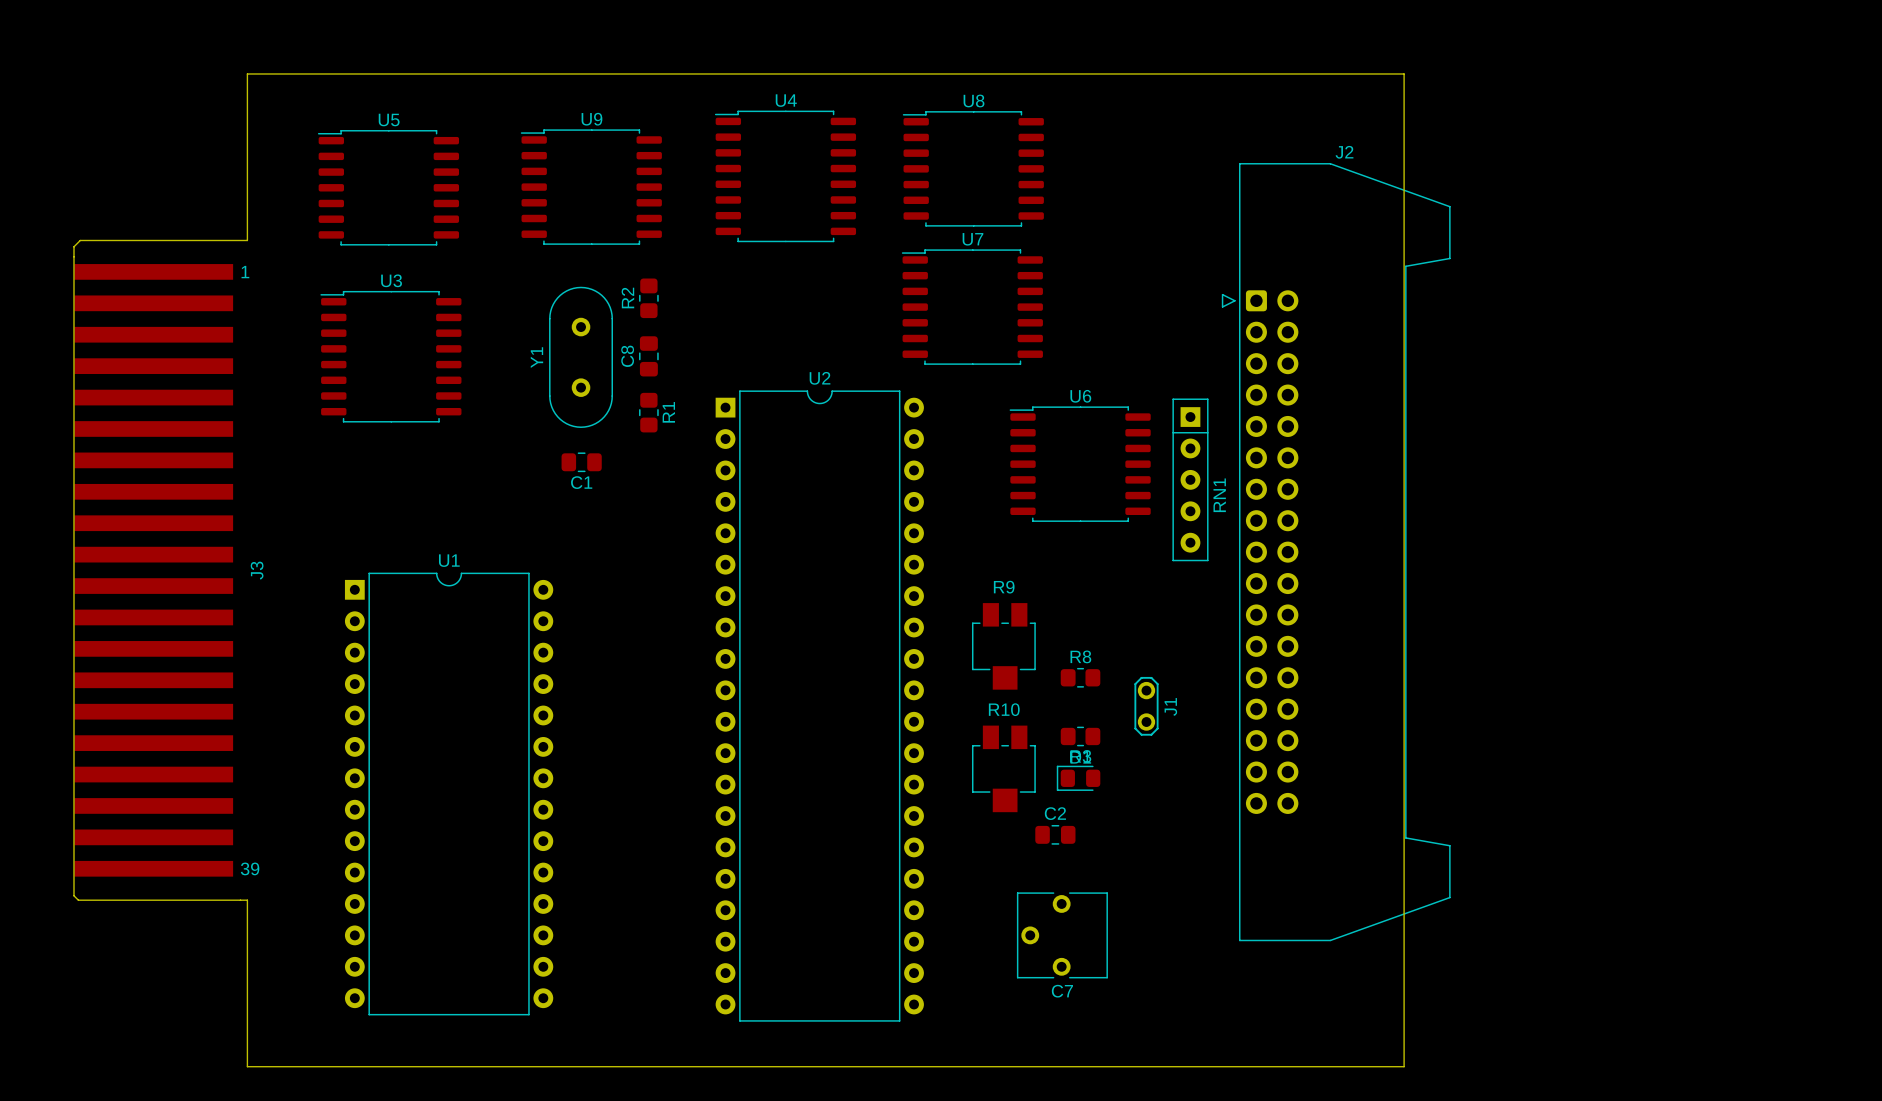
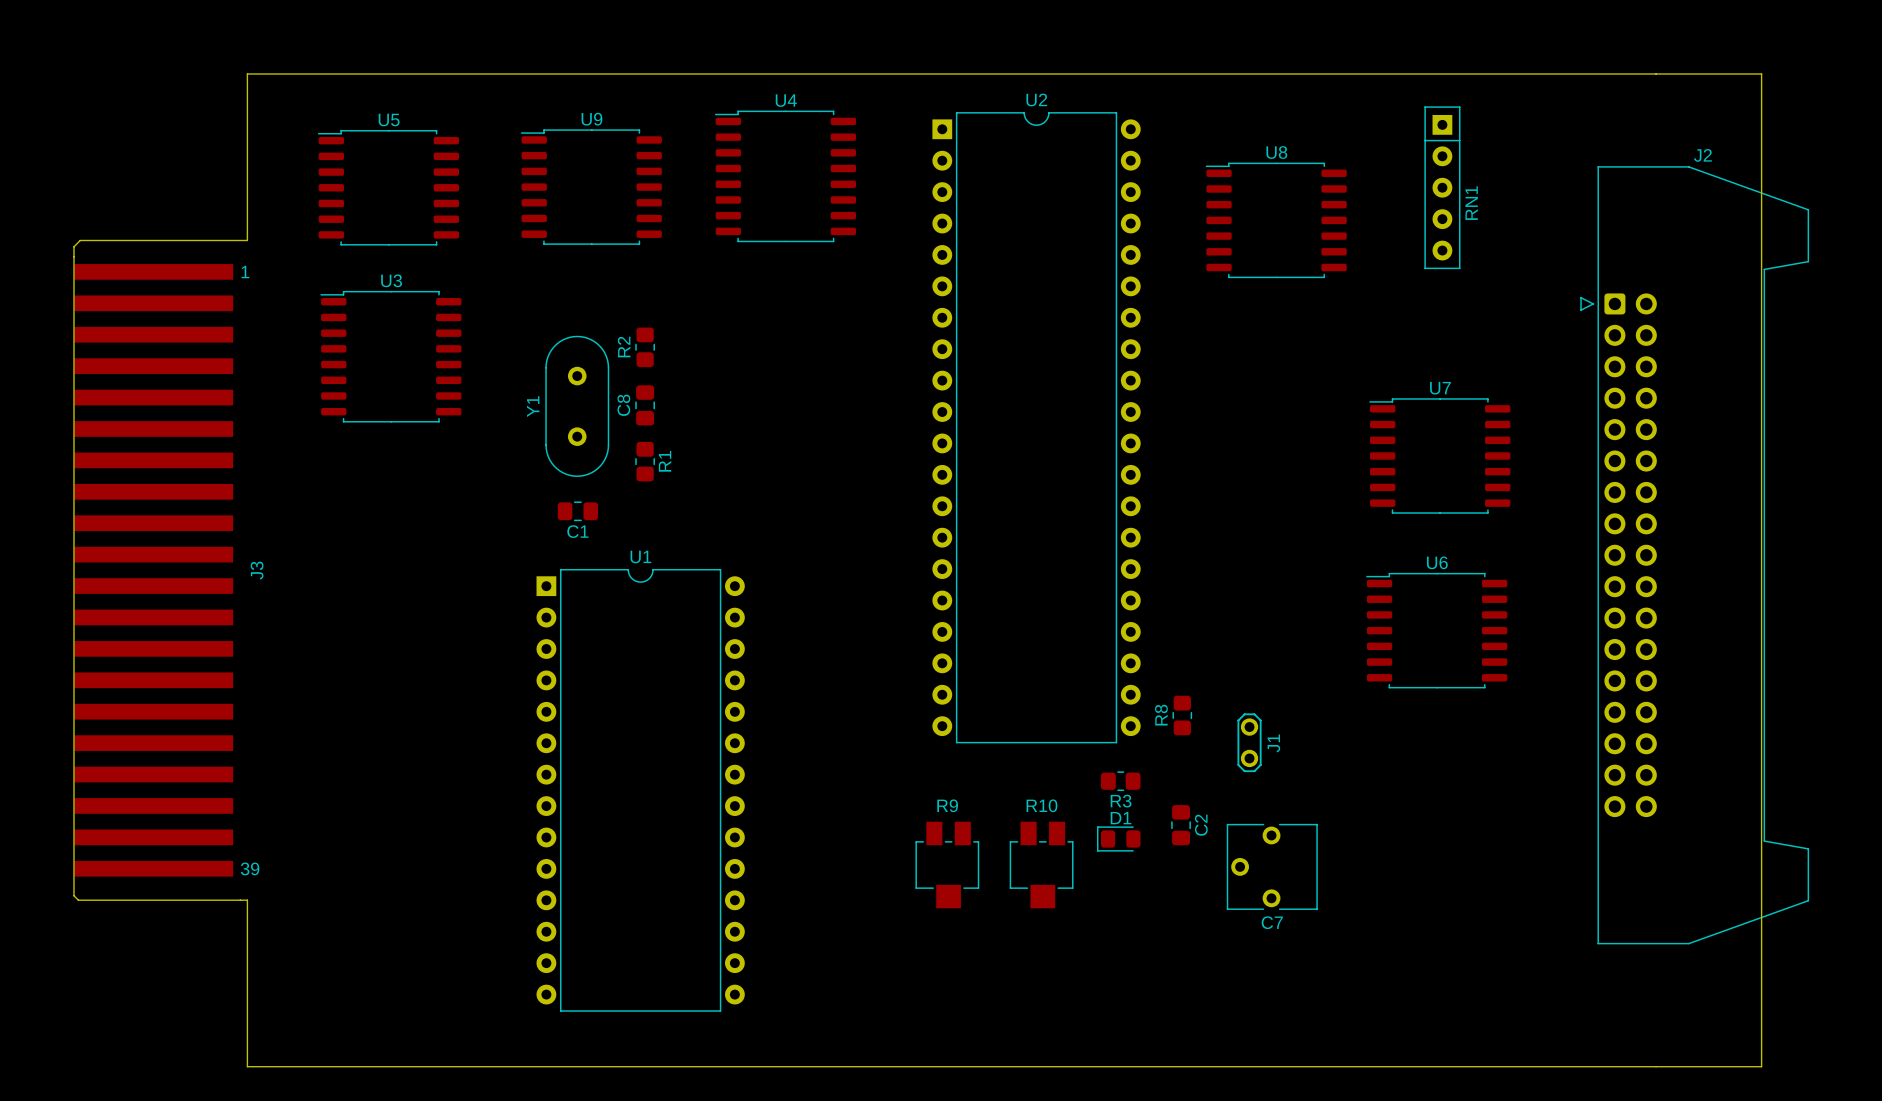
board edge: (1404, 73) (1404, 1066) -> (1404, 73) (1761, 73) (1761, 1066) (1404, 1066)
U8 position: (973, 168) -> (1276, 220)
R2 position: (648, 298) -> (645, 347)
U7 position: (972, 307) -> (1439, 455)
C8 position: (648, 356) -> (645, 405)
Y1 position: (581, 357) -> (577, 406)
R1 position: (648, 412) -> (645, 461)
C1 position: (581, 462) -> (577, 511)
U6 position: (1080, 464) -> (1436, 630)
RN1 position: (1190, 479) -> (1442, 187)
J2 position: (1336, 552) -> (1694, 555)
R9 position: (1003, 646) -> (947, 865)
R8 name position: R8 (1080, 656) -> R8 (1161, 715)
R8 rotation: 0° (1080, 677) -> 90° clockwise (1182, 715)
R8 position: (1080, 677) -> (1182, 715)
U2 position: (819, 706) -> (1036, 427)
J1 position: (1146, 706) -> (1249, 742)
R3 position: (1080, 736) -> (1120, 781)
R10 position: (1003, 768) -> (1041, 865)
D1 position: (1078, 778) -> (1118, 838)
U1 position: (449, 794) -> (640, 790)
C2 rotation: 0° (1055, 834) -> 90° clockwise (1181, 825)
C2 position: (1055, 834) -> (1181, 825)
C7 position: (1062, 935) -> (1272, 866)

